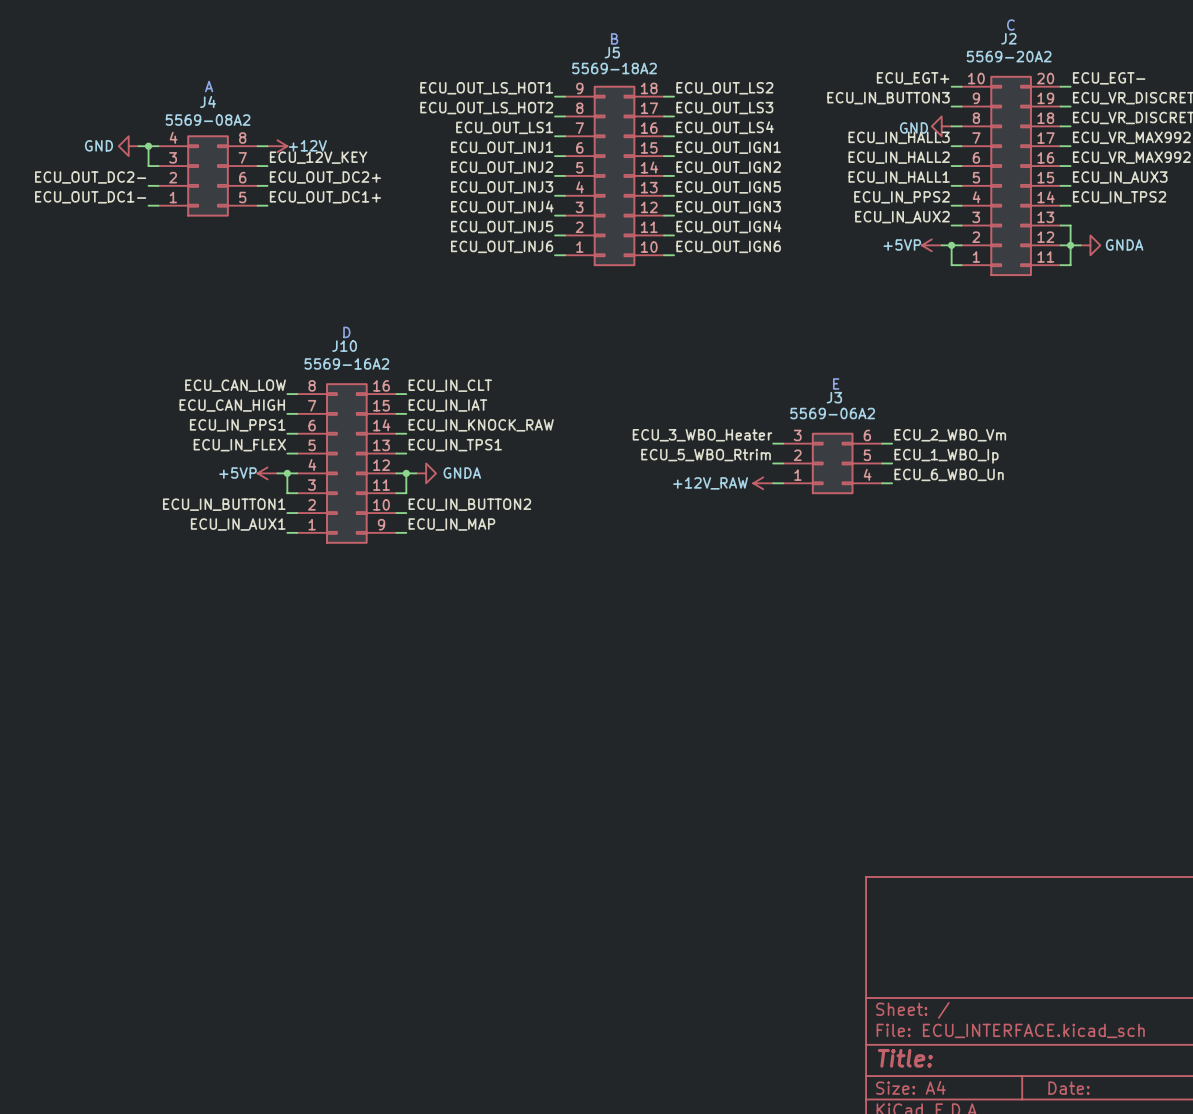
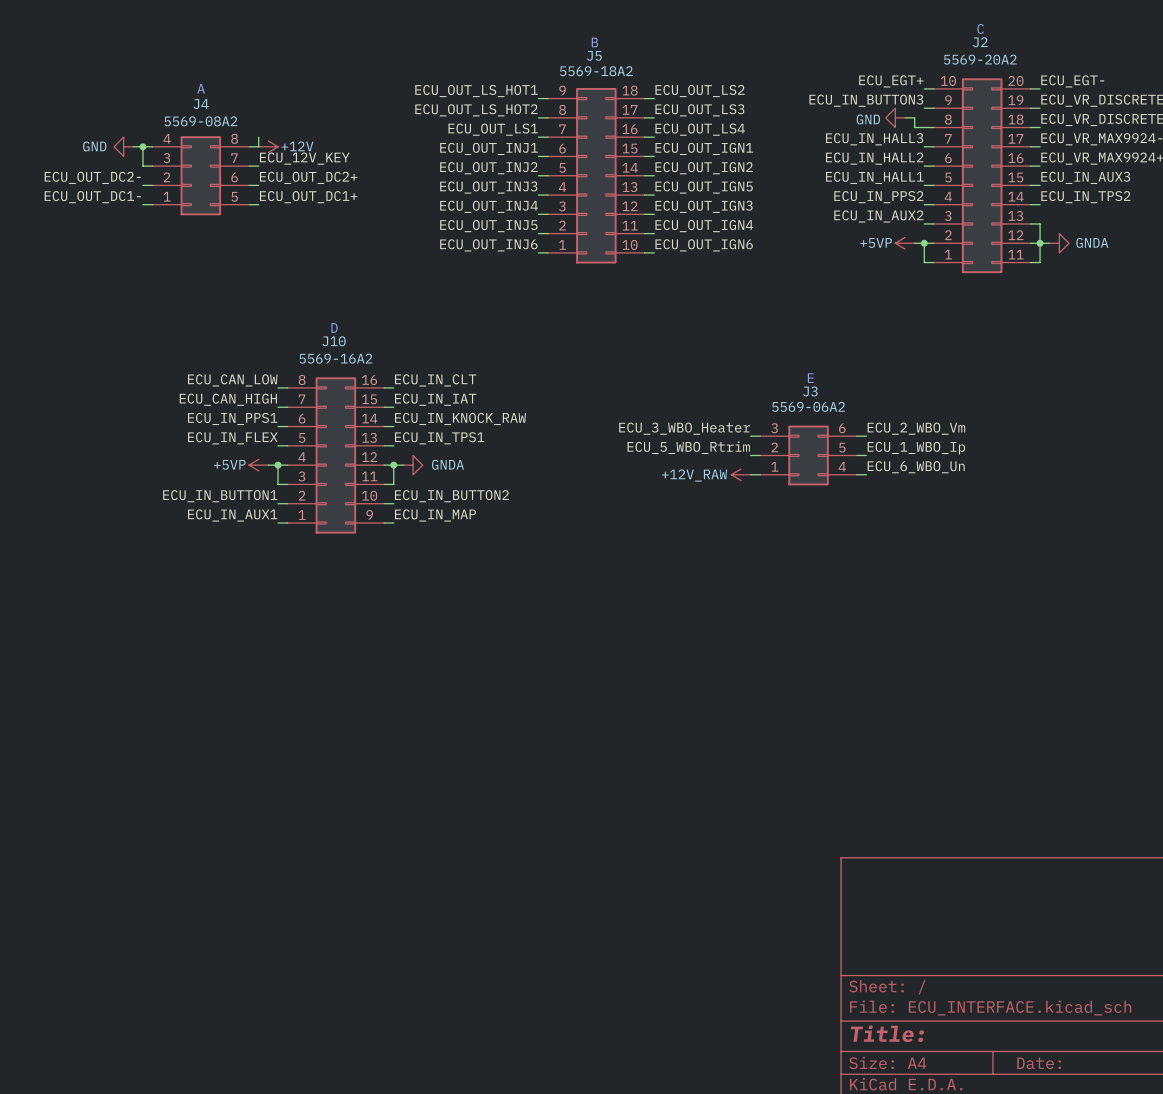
power symbol position: GND (941, 126) -> GND (895, 117)
wire: none -> (258, 137) (258, 146)

